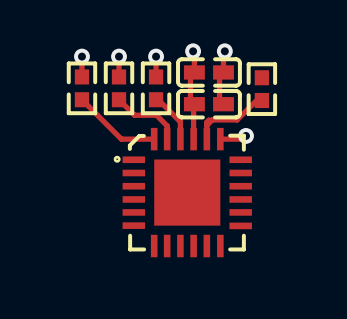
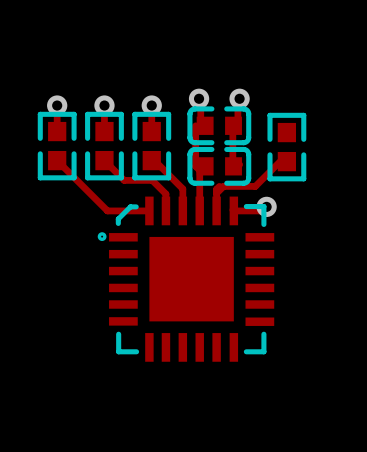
part footprint: [176, 57, 242, 88] -> [187, 106, 252, 146]
part footprint: [176, 89, 242, 120] -> [187, 146, 252, 186]

